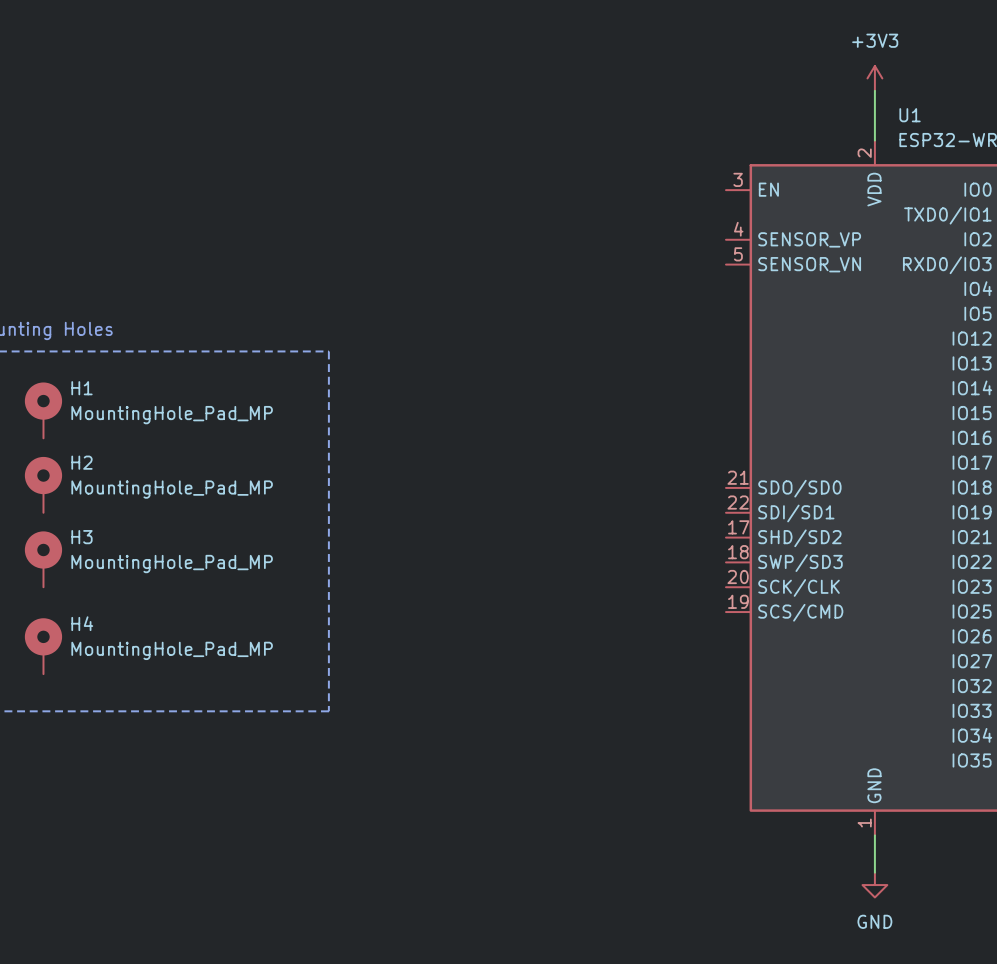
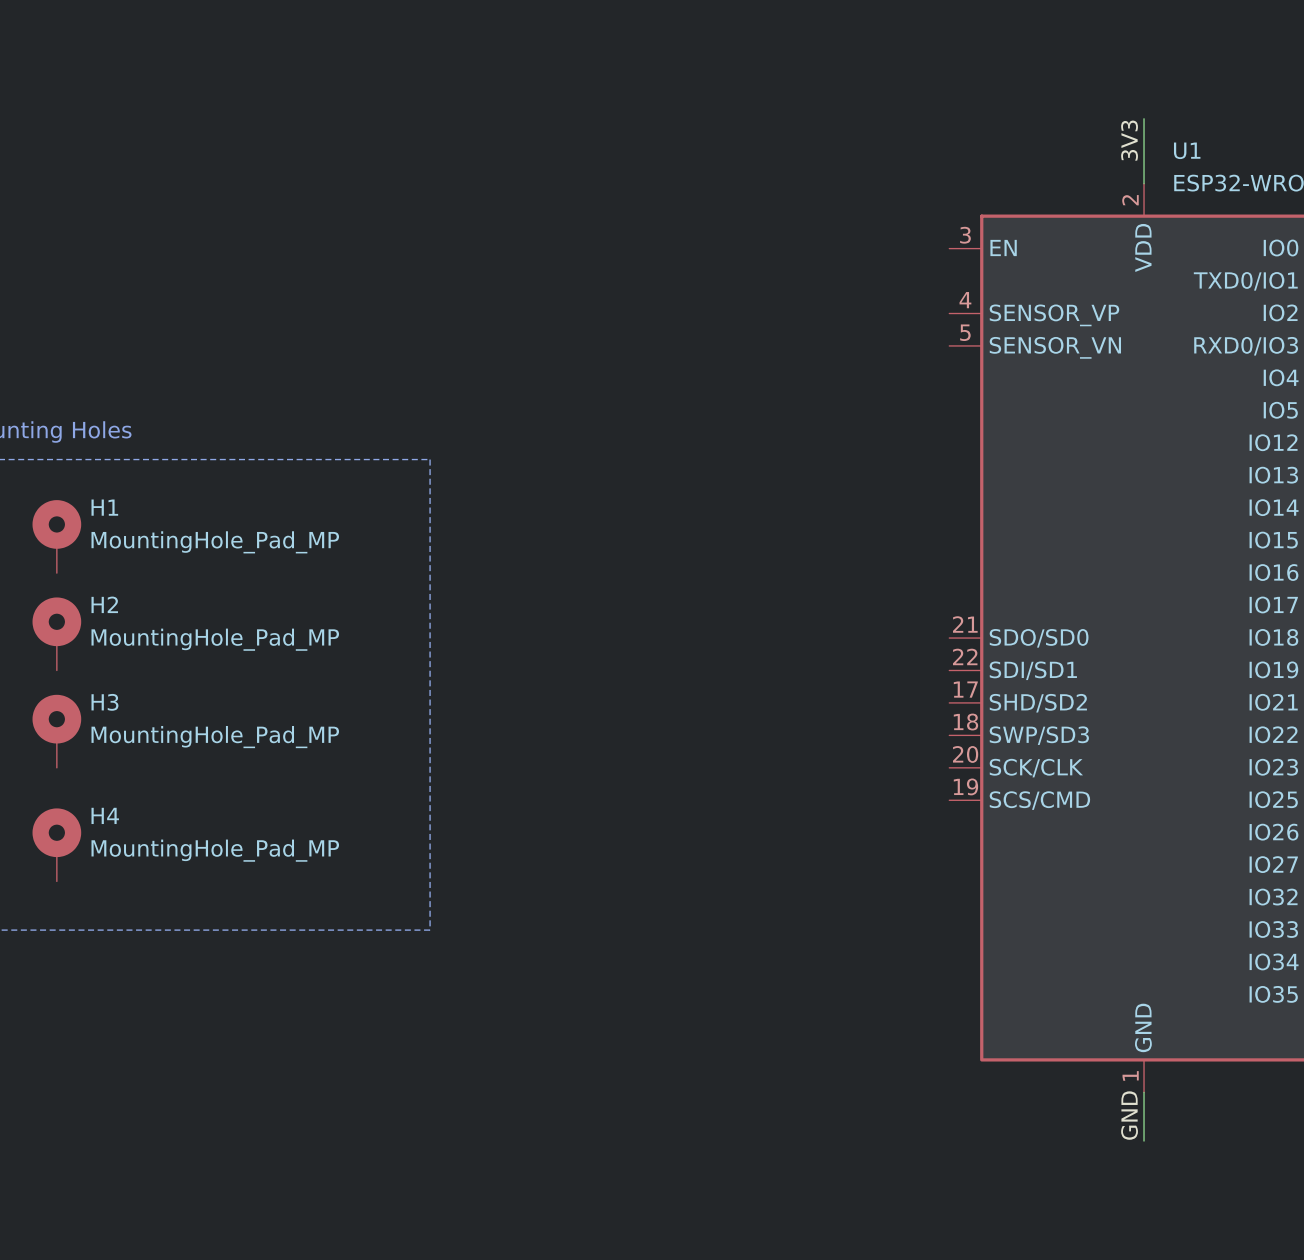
power symbol: +3V3 (874, 78) -> none
label: none -> 3V3 (1129, 140)
label: none -> GND (1129, 1115)
power symbol: GND (874, 885) -> none

